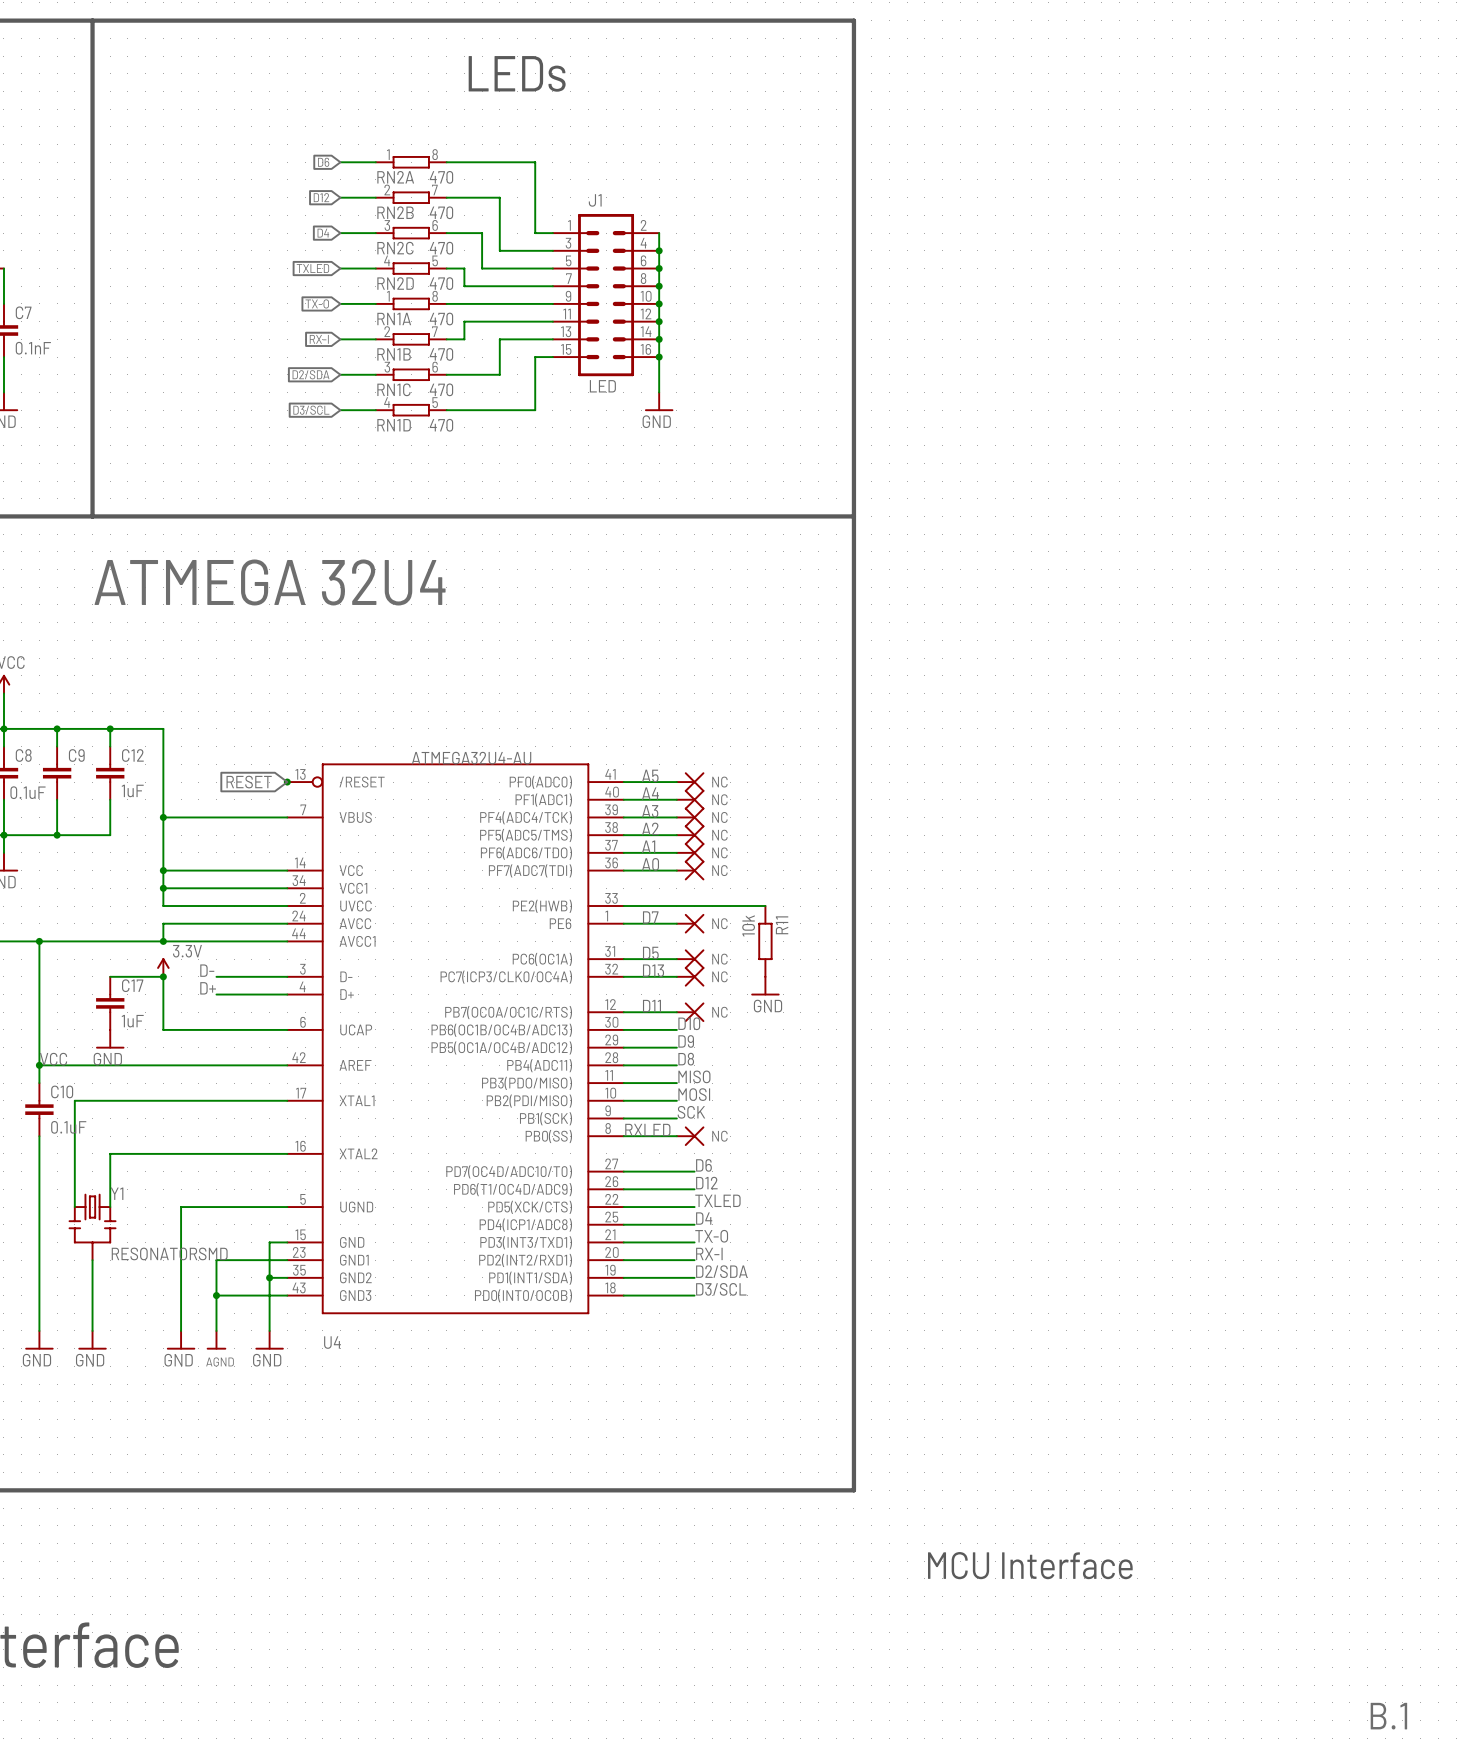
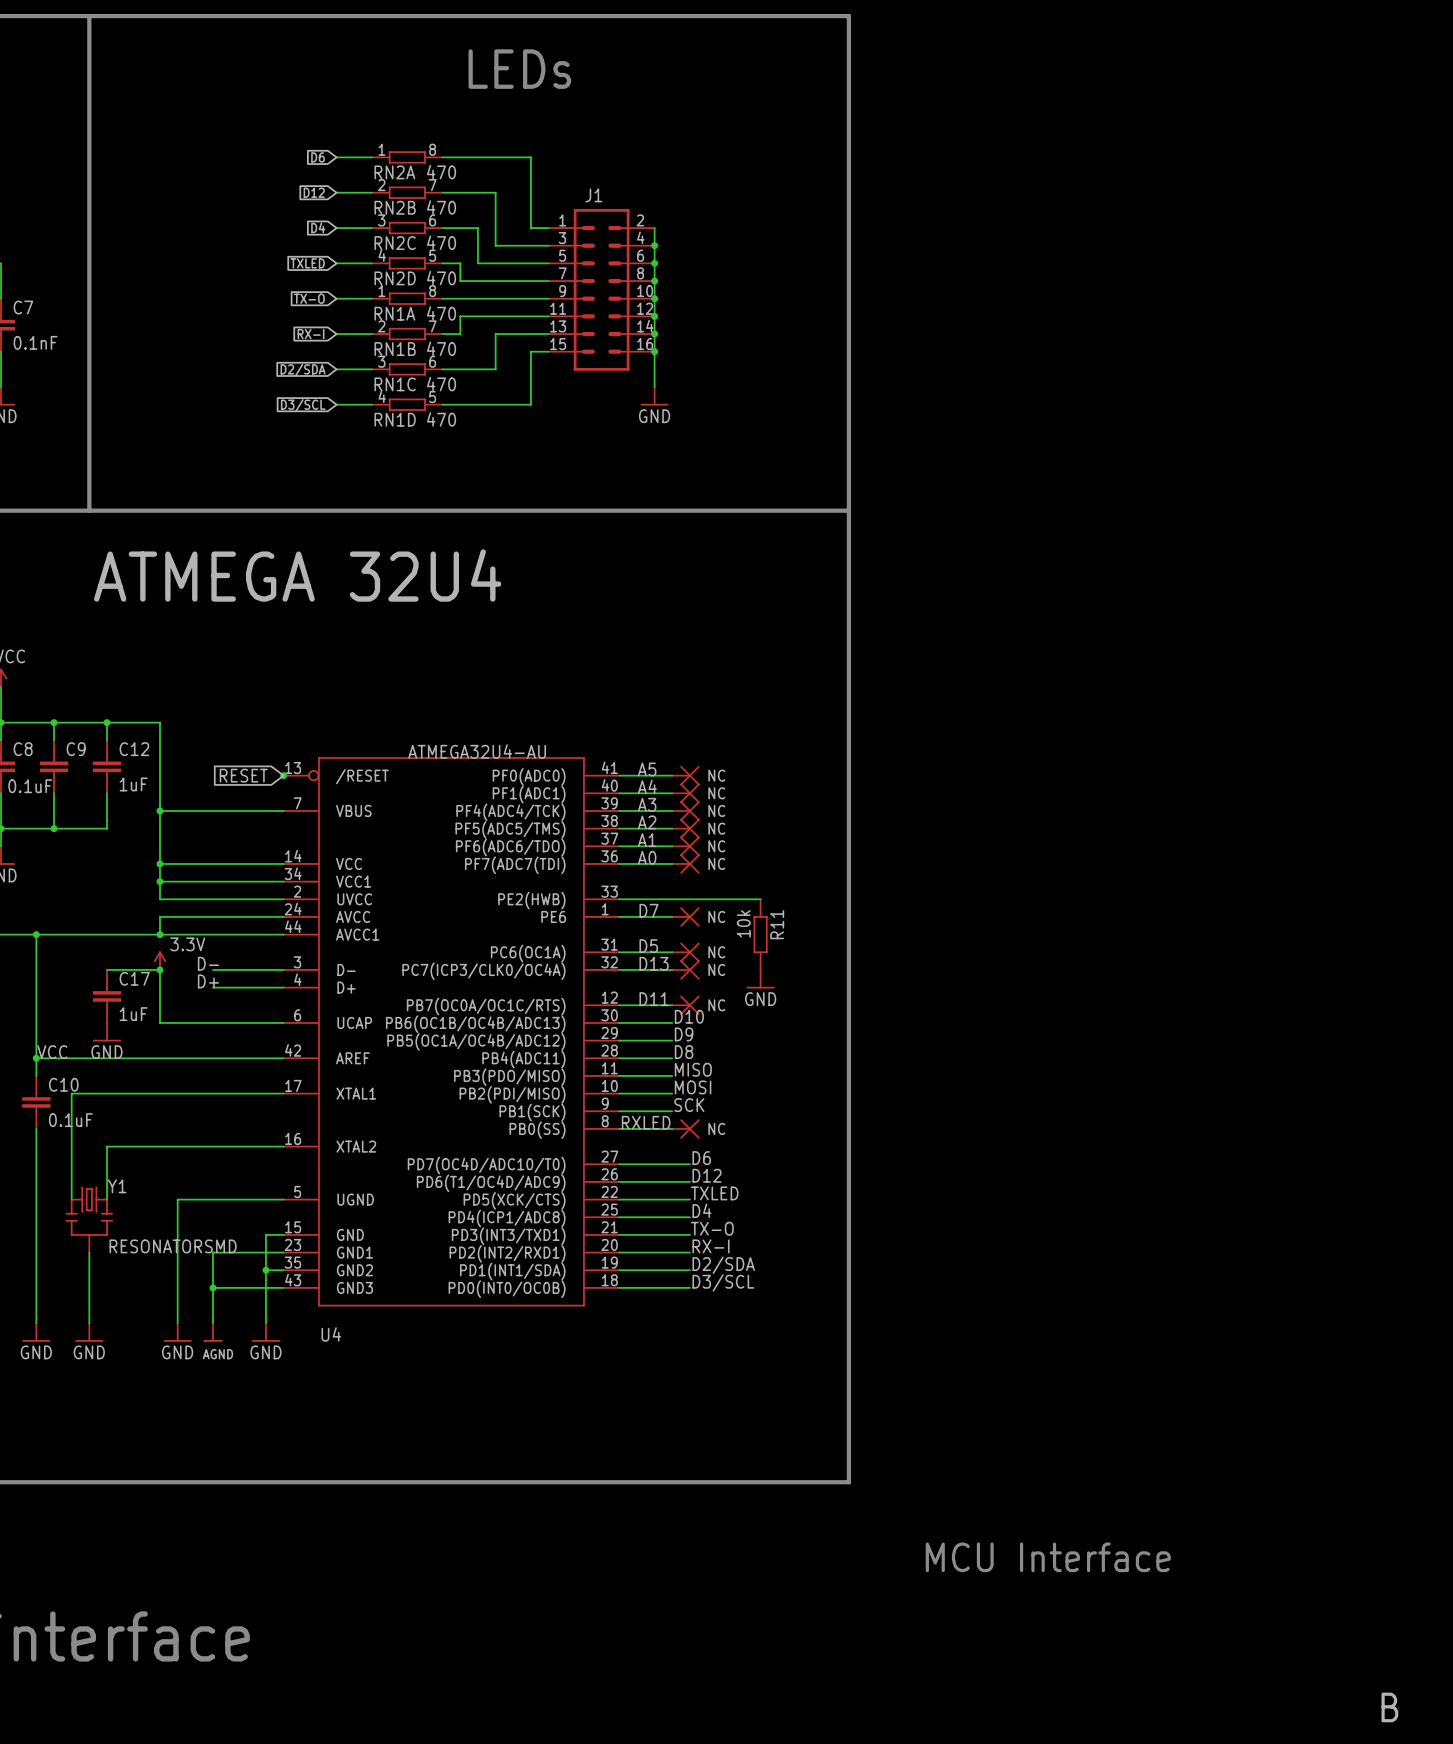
J1 value: LED (602, 386) -> none
text: B.1 (1388, 1716) -> none
text: none -> B (1389, 1707)

